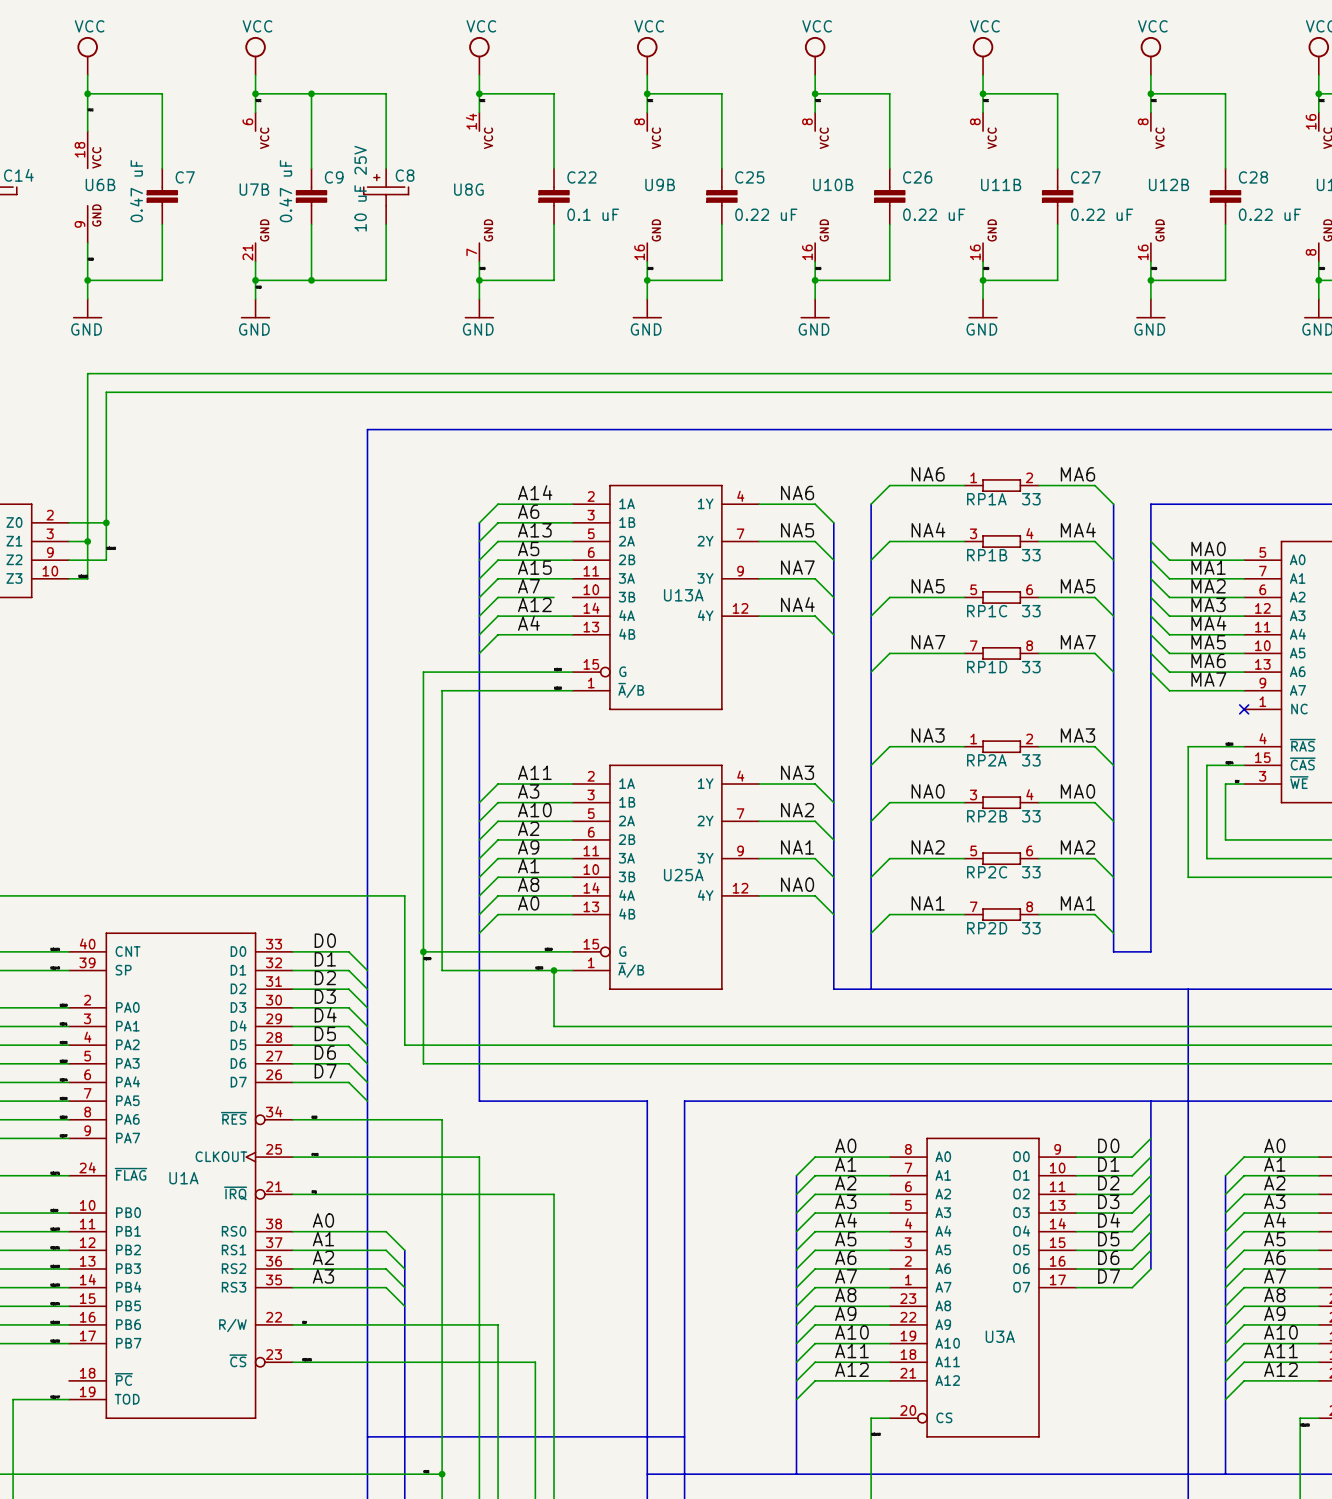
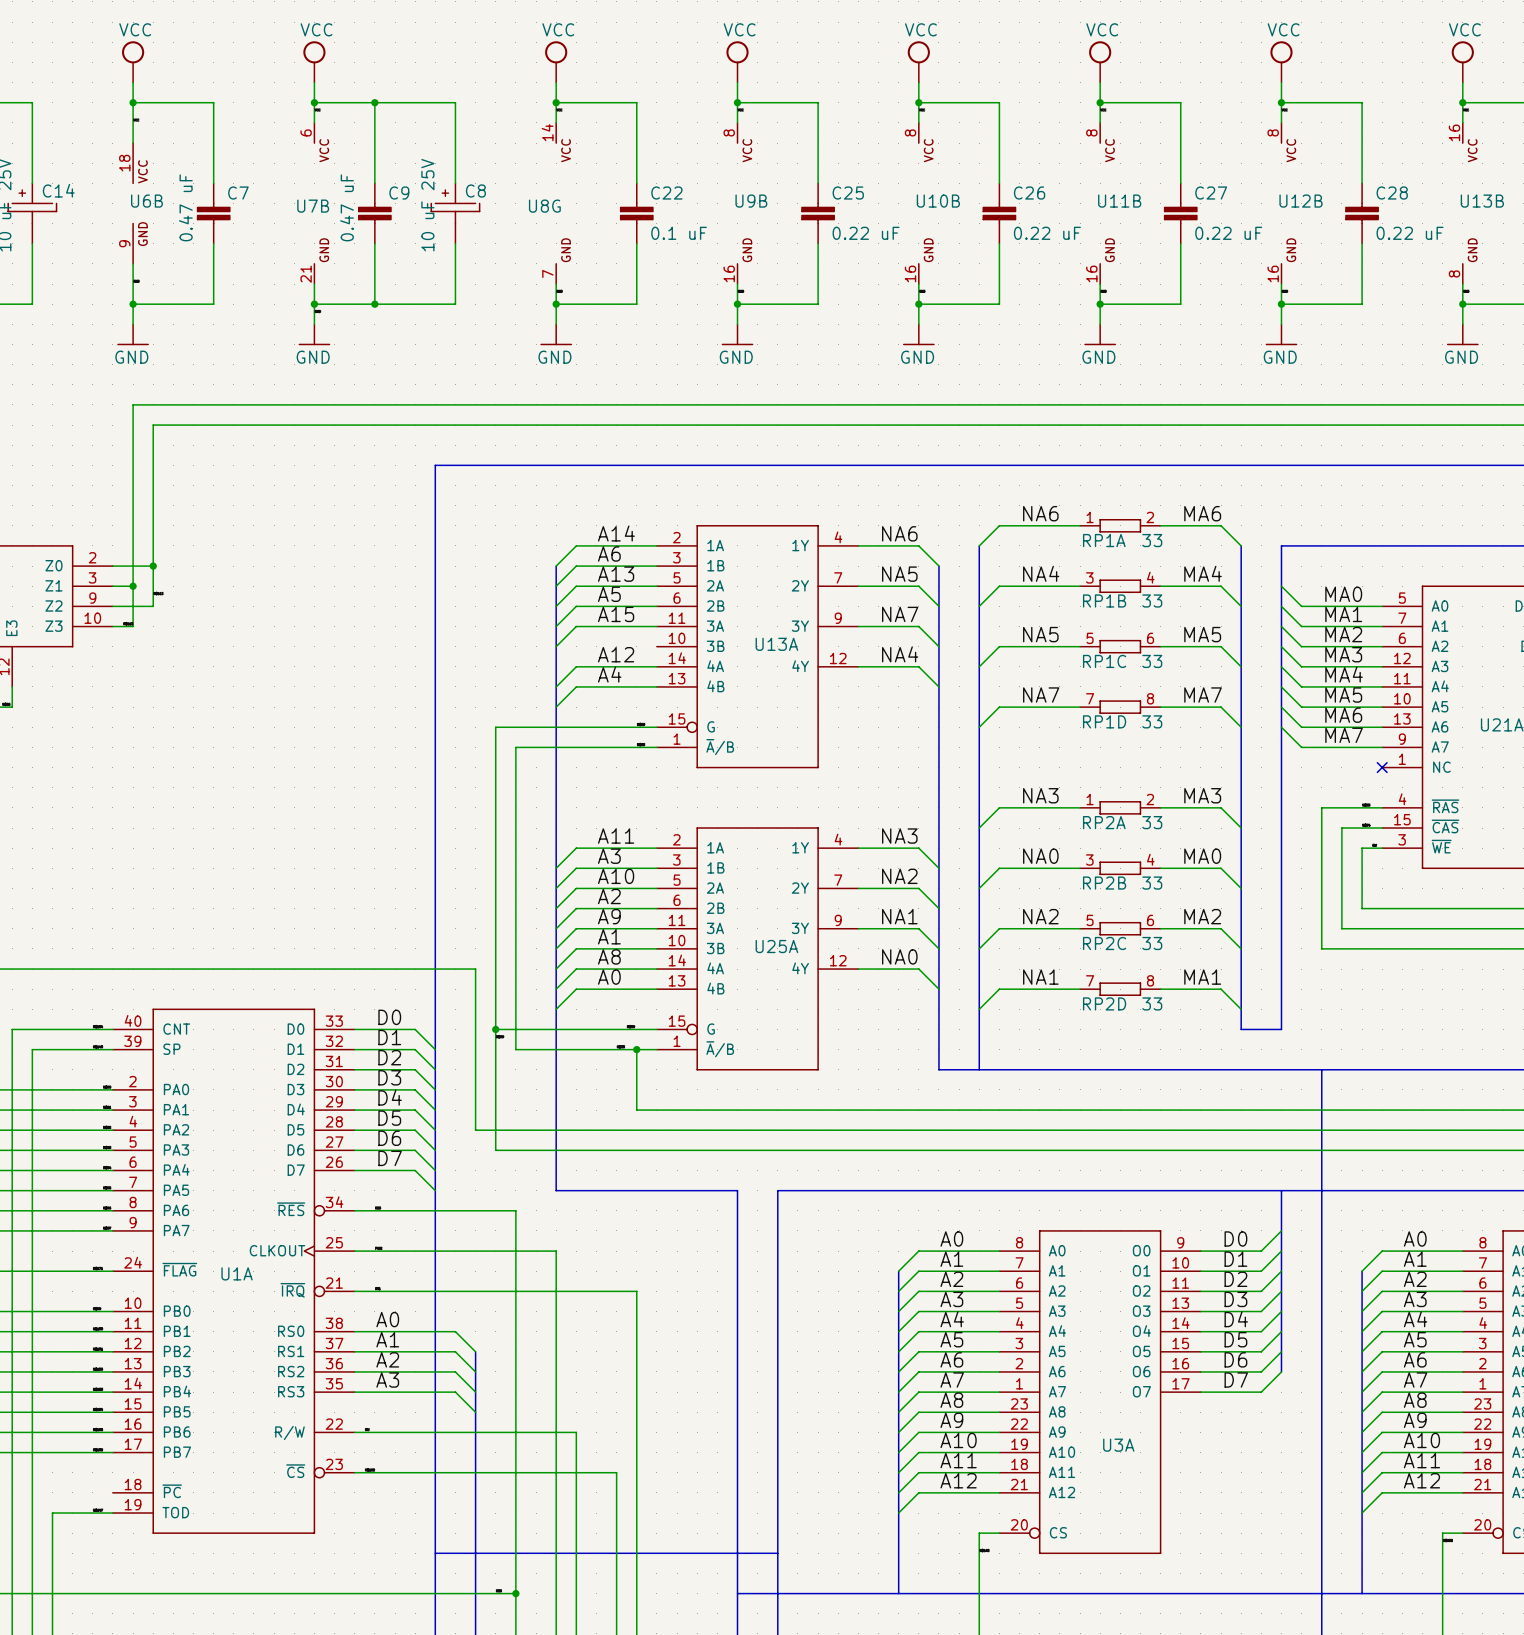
label: A7 (528, 586) -> none
wire: (554, 597) (498, 597) (479, 616) -> none

